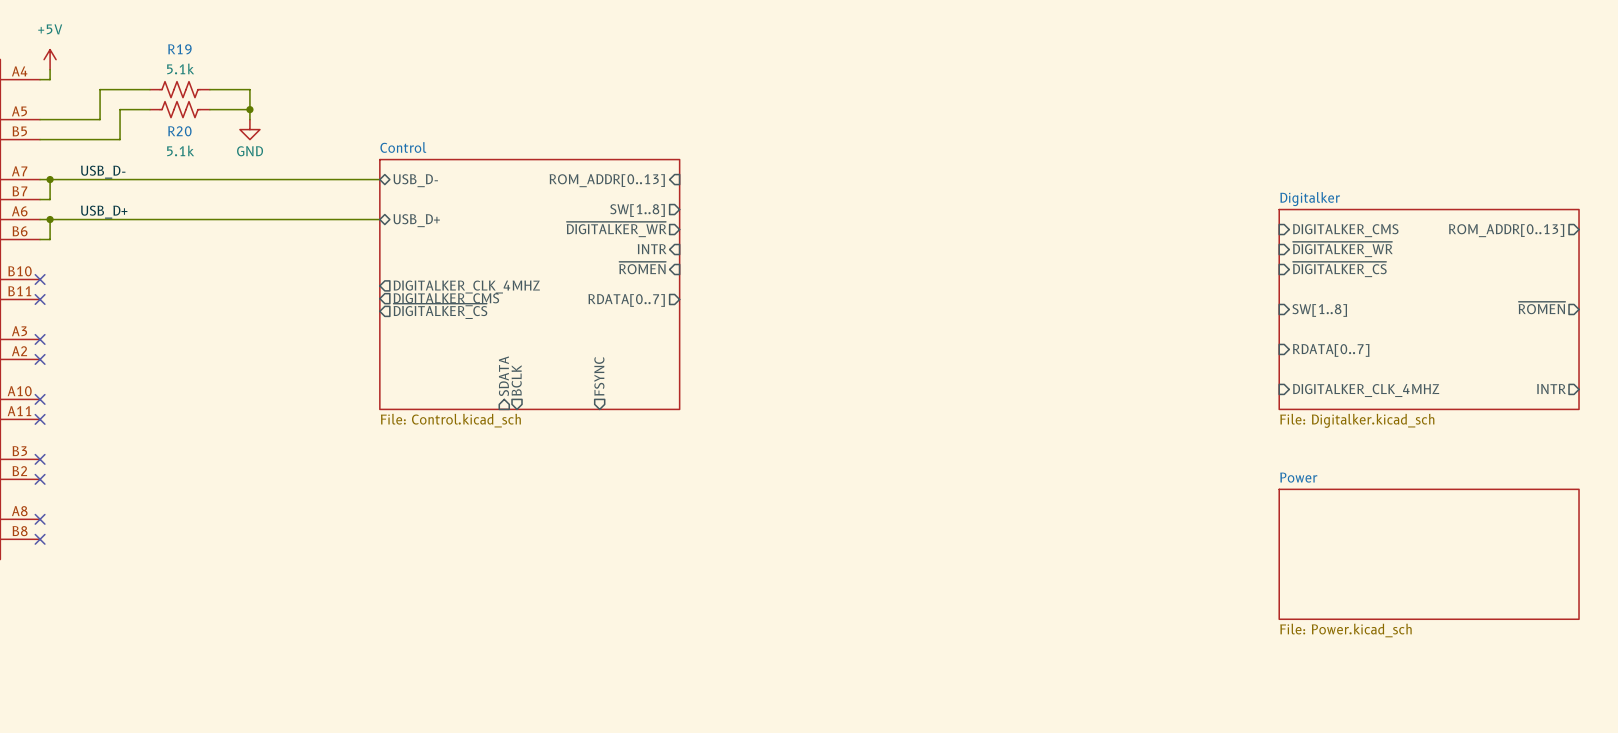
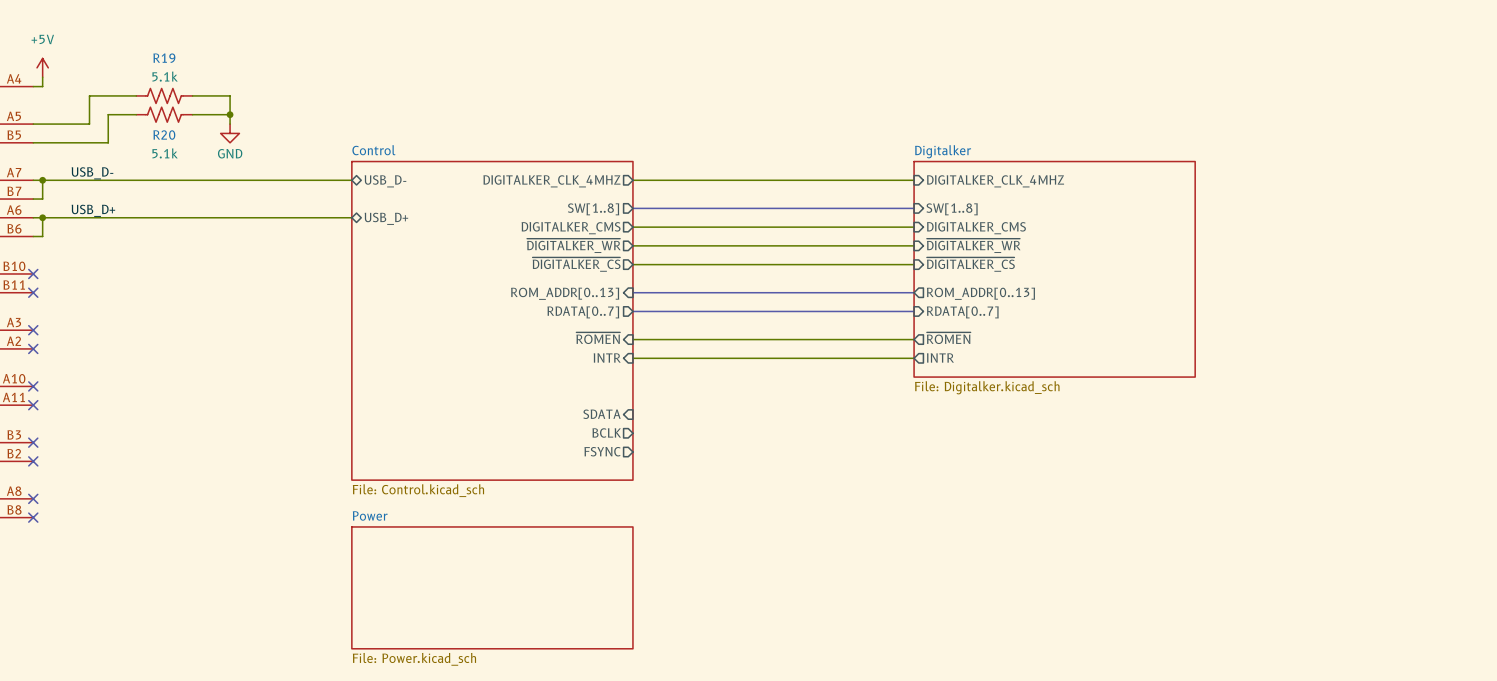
wire: none -> (632, 180) (914, 180)
sheet pin shape: input (607, 180) -> output (551, 181)
sheet pin: ROM_ADDR[0..13] (607, 180) -> DIGITALKER_CLK_4MHZ (551, 181)
sheet pin: none -> DIGITALKER_CLK_4MHZ (995, 181)
bus: none -> (632, 208) (914, 208)
sheet pin: none -> SW[1..8] (952, 209)
sheet pin: ~{DIGITALKER_WR} (616, 229) -> DIGITALKER_CMS (571, 228)
wire: none -> (632, 227) (914, 227)
sheet pin: none -> DIGITALKER_CMS (976, 228)
sheet pin: DIGITALKER_CMS (1345, 230) -> none
sheet pin: ROM_ADDR[0..13] (1506, 230) -> none
sheet pin shape: input (652, 249) -> output (573, 245)
sheet pin: INTR (652, 249) -> ~{DIGITALKER_WR} (573, 245)
wire: none -> (632, 245) (914, 245)
sheet pin: none -> ~{DIGITALKER_WR} (973, 245)
sheet pin: ~{DIGITALKER_WR} (1342, 249) -> none
sheet pin shape: input (642, 268) -> output (576, 264)
sheet pin: ~{ROMEN} (642, 268) -> ~{DIGITALKER_CS} (576, 264)
wire: none -> (632, 264) (914, 264)
sheet pin: none -> ~{DIGITALKER_CS} (970, 264)
sheet pin: ~{DIGITALKER_CS} (1339, 269) -> none
sheet Digitalker: none -> File: Digitalker.kicad_sch (1054, 269)
sheet Control: File: Control.kicad_sch (529, 284) -> none
sheet pin: DIGITALKER_CLK_4MHZ (466, 287) -> none
sheet pin: DIGITALKER_CMS (446, 299) -> none
bus: none -> (632, 292) (914, 292)
sheet pin shape: output (626, 300) -> input (565, 293)
sheet pin: RDATA[0..7] (626, 300) -> ROM_ADDR[0..13] (565, 293)
sheet pin: none -> ROM_ADDR[0..13] (980, 293)
sheet pin: ~{ROMEN} (1541, 308) -> none
sheet Digitalker: File: Digitalker.kicad_sch (1429, 309) -> none
sheet pin: SW[1..8] (1319, 310) -> none
sheet pin: ~{DIGITALKER_CS} (440, 311) -> none
bus: none -> (632, 311) (914, 311)
sheet pin: none -> RDATA[0..7] (583, 312)
sheet pin: none -> RDATA[0..7] (962, 312)
sheet Control: none -> File: Control.kicad_sch (492, 320)
sheet pin: none -> ~{ROMEN} (598, 338)
sheet pin: none -> ~{ROMEN} (948, 338)
wire: none -> (632, 339) (914, 339)
sheet pin: RDATA[0..7] (1331, 350) -> none
sheet pin: none -> INTR (607, 357)
wire: none -> (632, 358) (914, 358)
sheet pin: none -> INTR (940, 357)
sheet pin rotation: 0° (503, 376) -> 90° counterclockwise (602, 414)
sheet pin position: SDATA (503, 376) -> SDATA (602, 414)
sheet pin rotation: 0° (599, 376) -> 90° counterclockwise (602, 451)
sheet pin position: FSYNC (599, 376) -> FSYNC (602, 451)
sheet pin rotation: 0° (516, 380) -> 90° counterclockwise (606, 432)
sheet pin position: BCLK (516, 380) -> BCLK (606, 432)
sheet pin: INTR (1551, 389) -> none
sheet pin: DIGITALKER_CLK_4MHZ (1366, 390) -> none
sheet Power: File: Power.kicad_sch (1429, 554) -> none
sheet Power: none -> File: Power.kicad_sch (492, 587)

